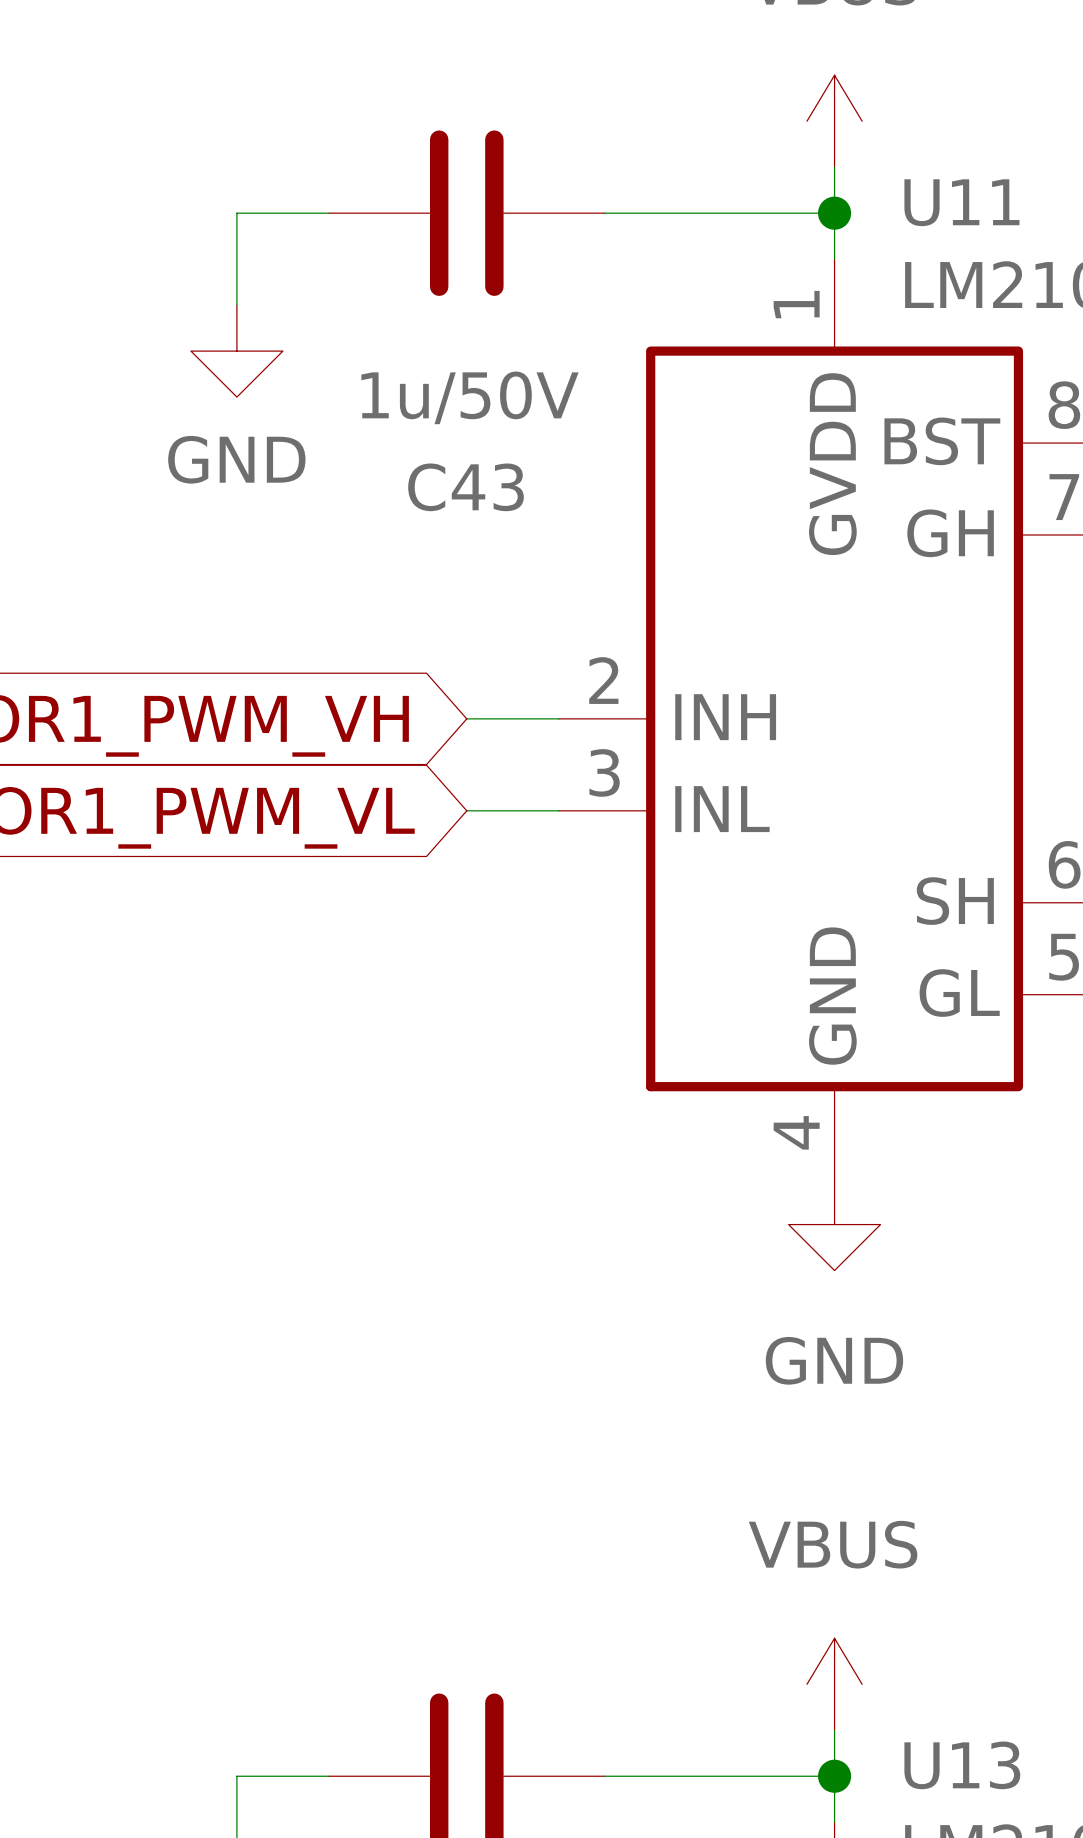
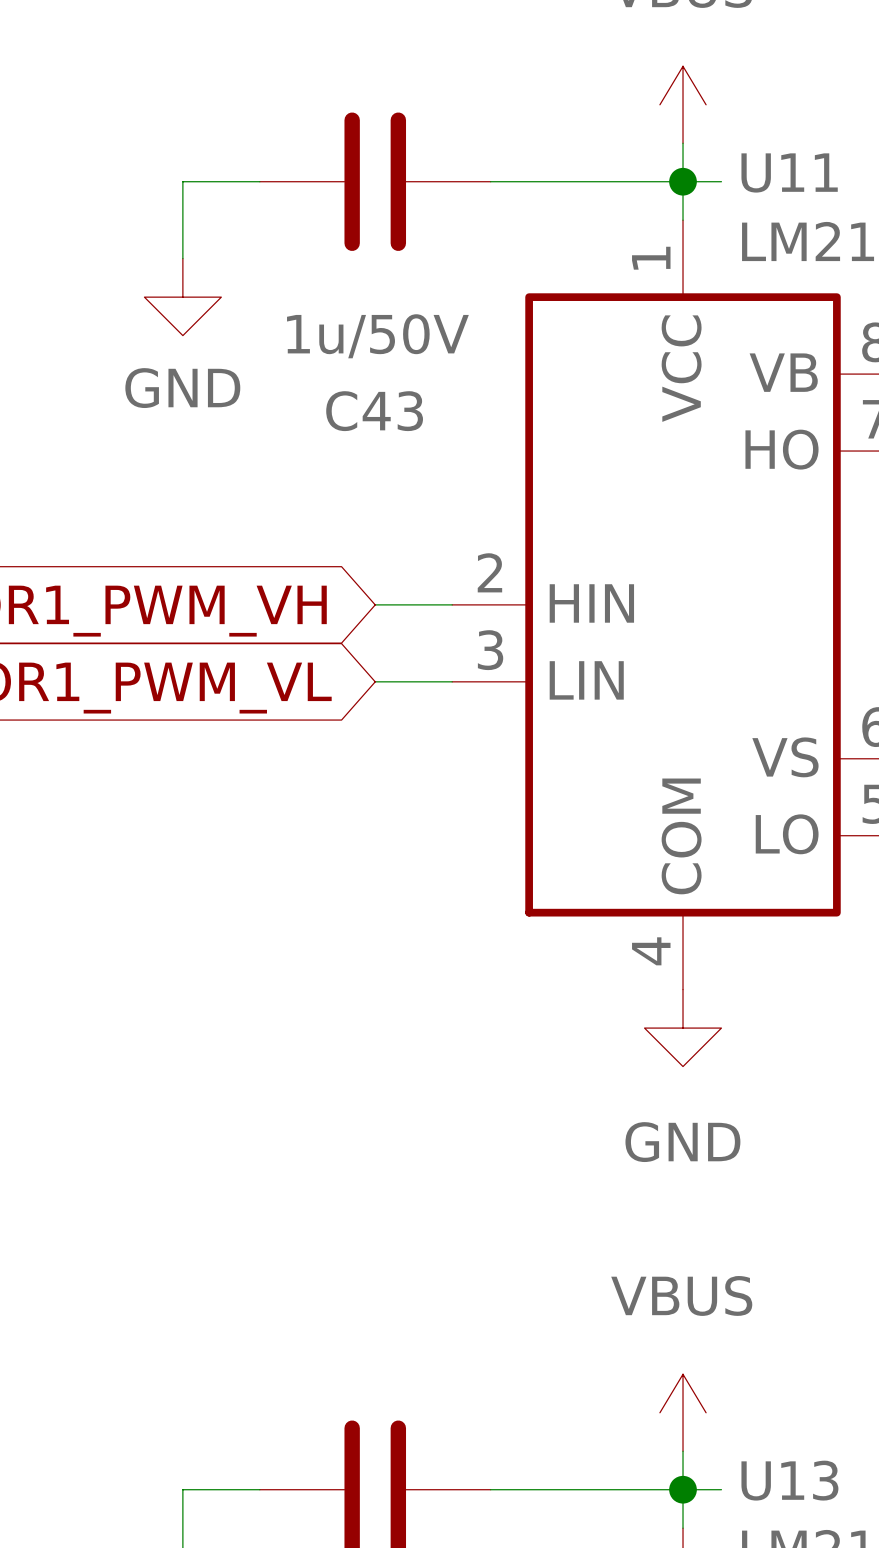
wire: none -> (683, 181) (721, 181)
U11 pin name: BST (942, 441) -> VB (783, 372)
U11 pin name: GVDD (832, 464) -> VCC (681, 368)
U11 pin name: GH (950, 533) -> HO (782, 449)
U11 pin name: INH (725, 717) -> HIN (591, 603)
U11 pin name: INL (722, 809) -> LIN (586, 680)
U11 pin name: SH (955, 901) -> VS (785, 757)
U11 pin name: GL (959, 993) -> LO (787, 834)
U11 pin name: GND (832, 996) -> COM (681, 836)
wire: none -> (683, 1489) (721, 1489)

